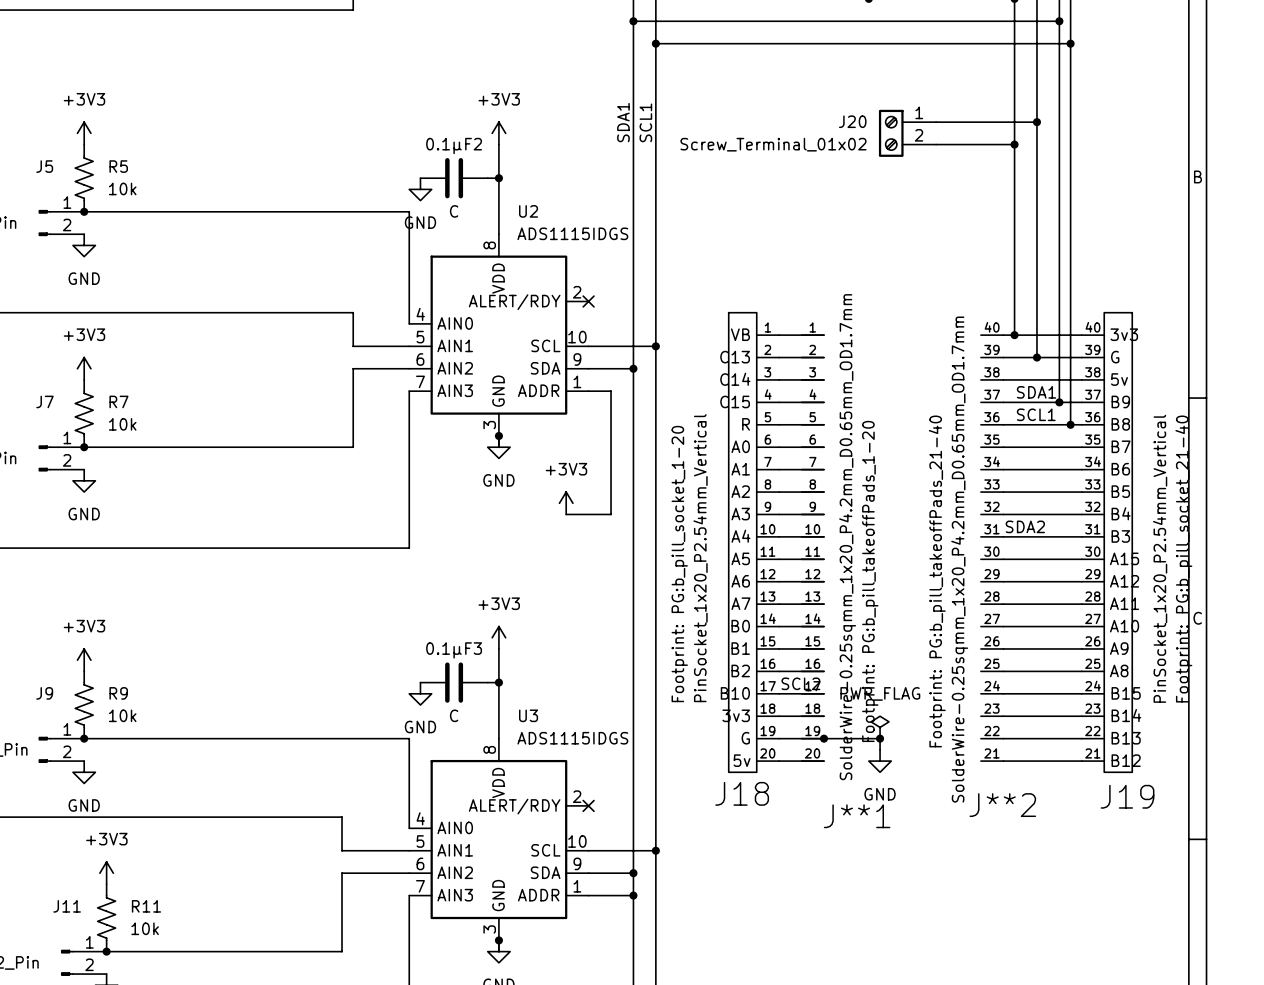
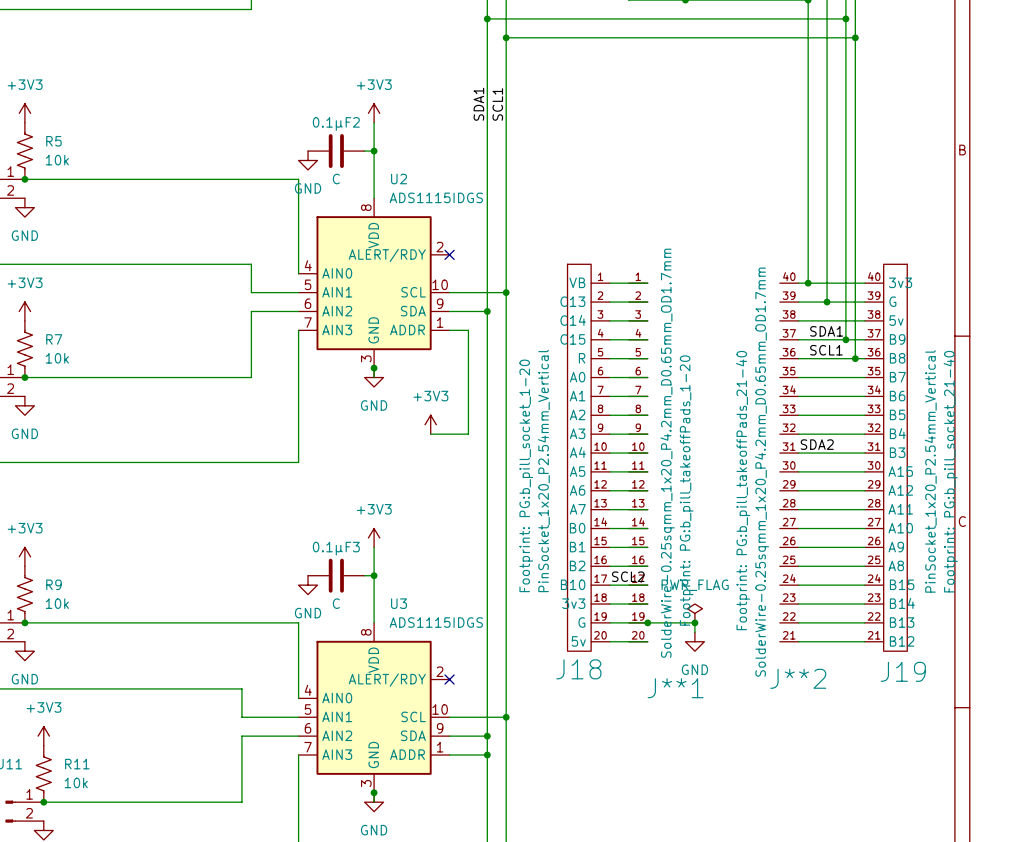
wire: (936, 122) (1036, 122) -> none
junction: (1036, 122) -> none
J20: Screw_Terminal_01x02 (907, 133) -> none
wire: (936, 144) (1014, 144) -> none
junction: (1014, 144) -> none

